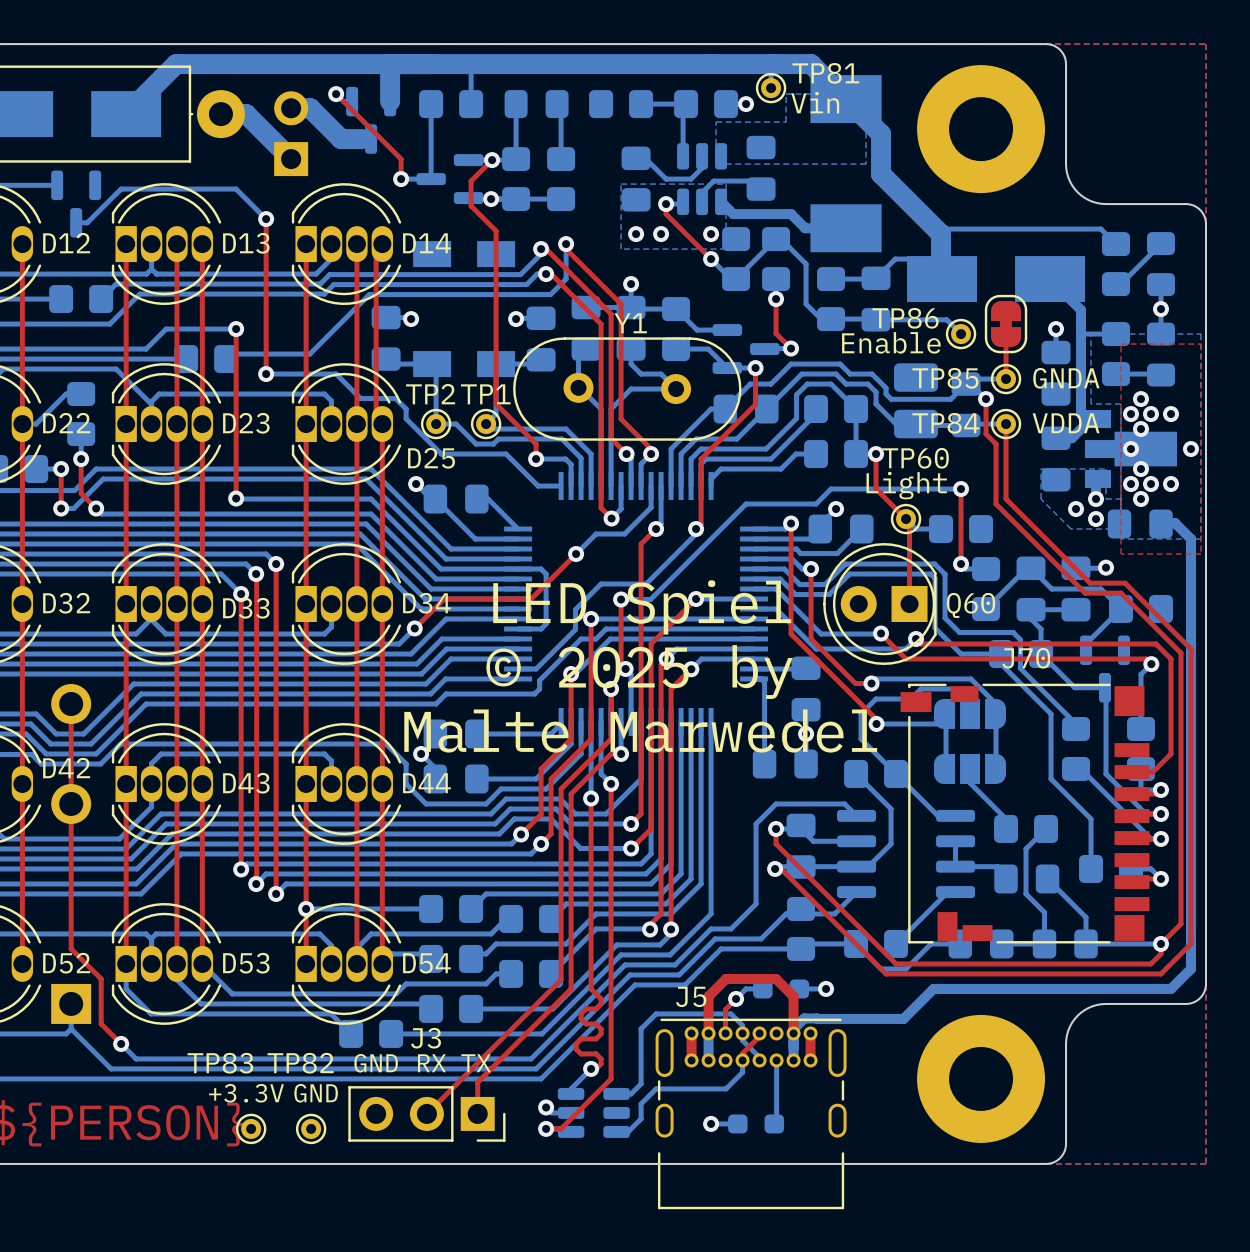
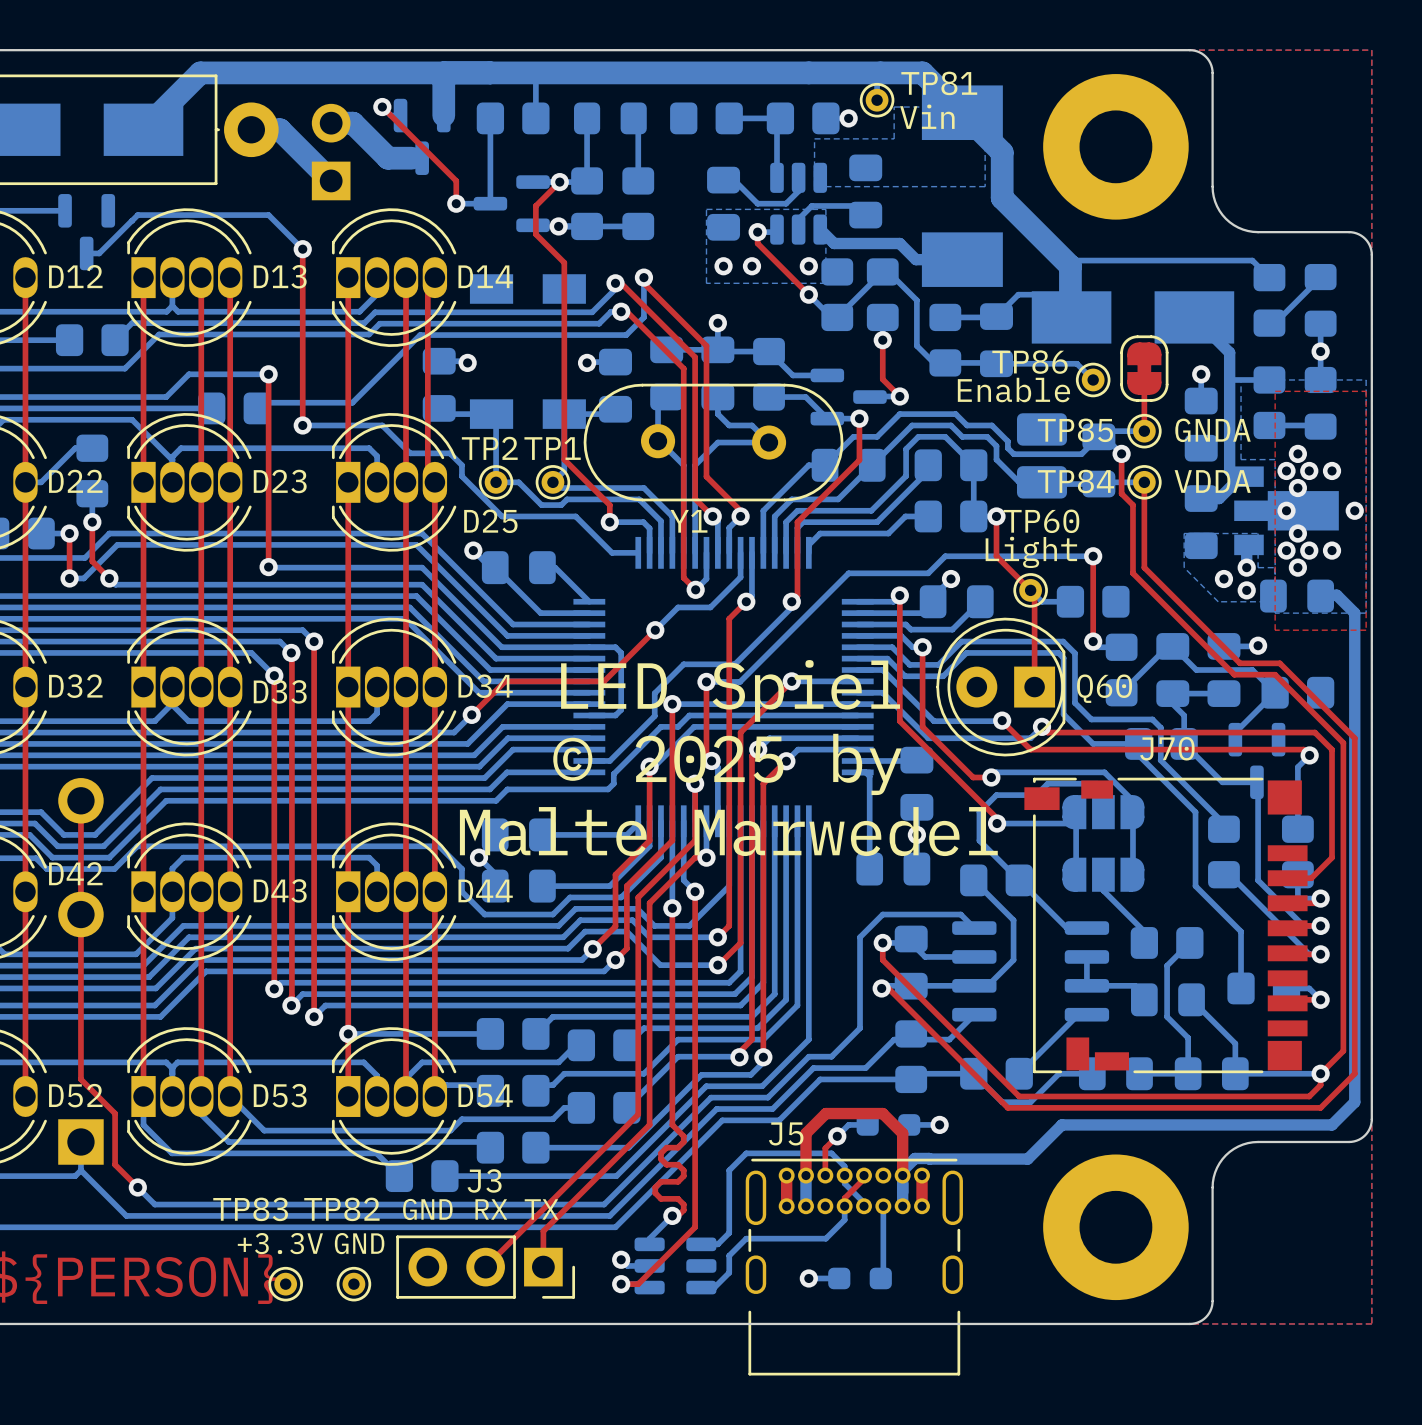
Y1 name position: Y1 (630, 323) -> Y1 (688, 521)

